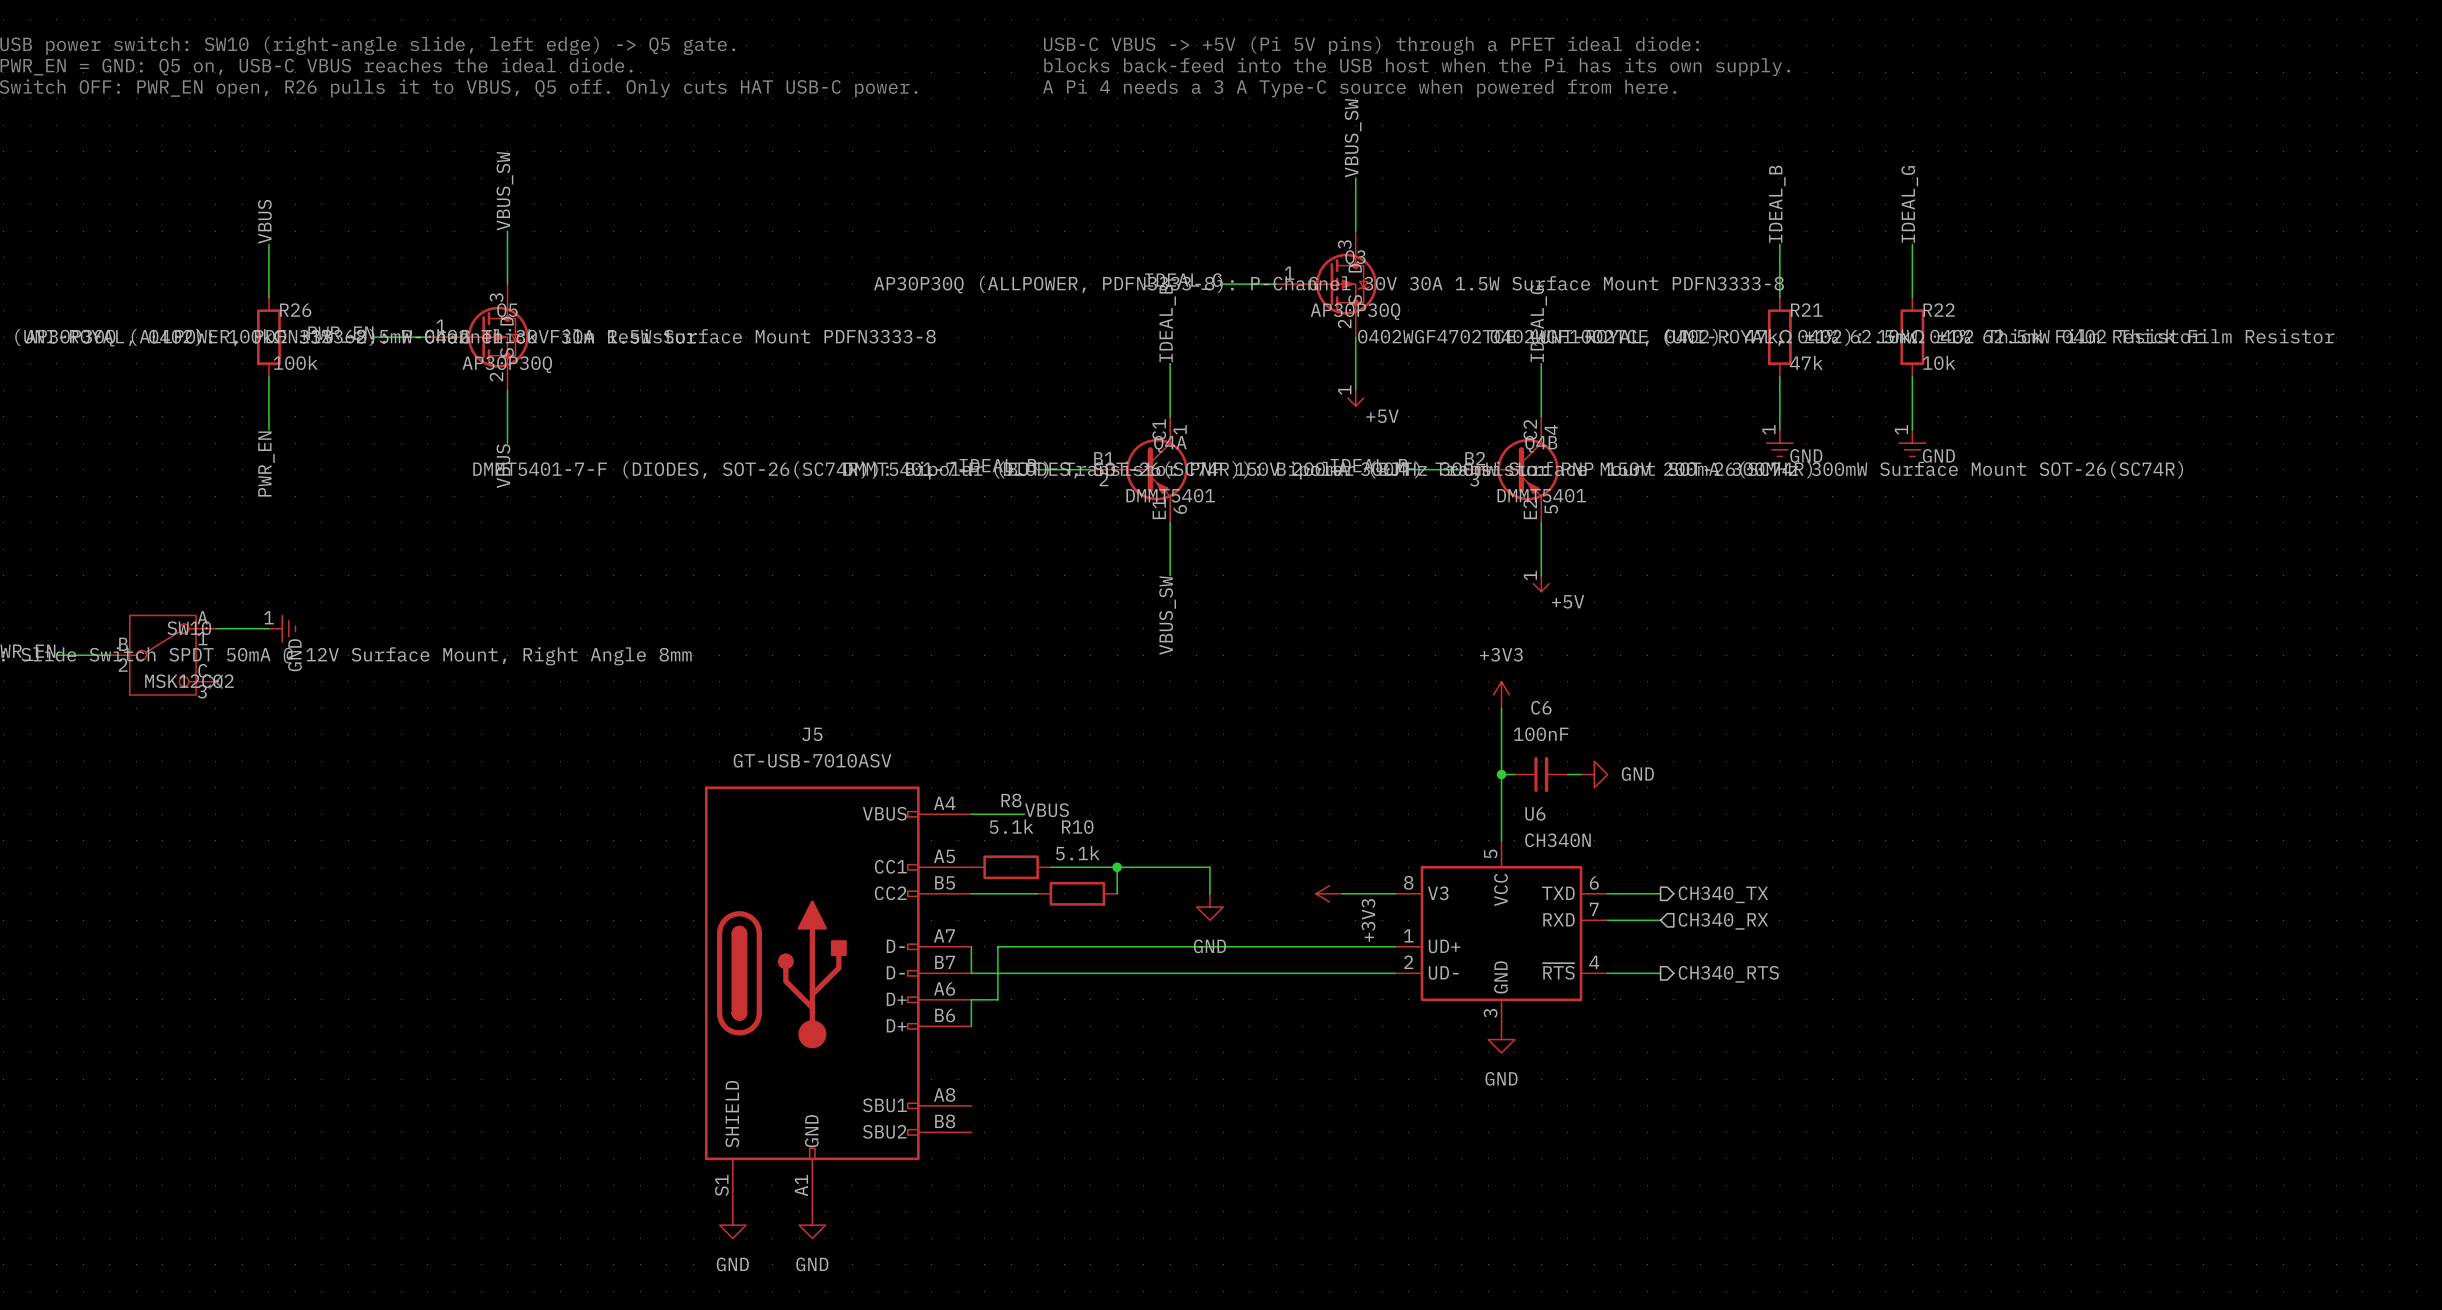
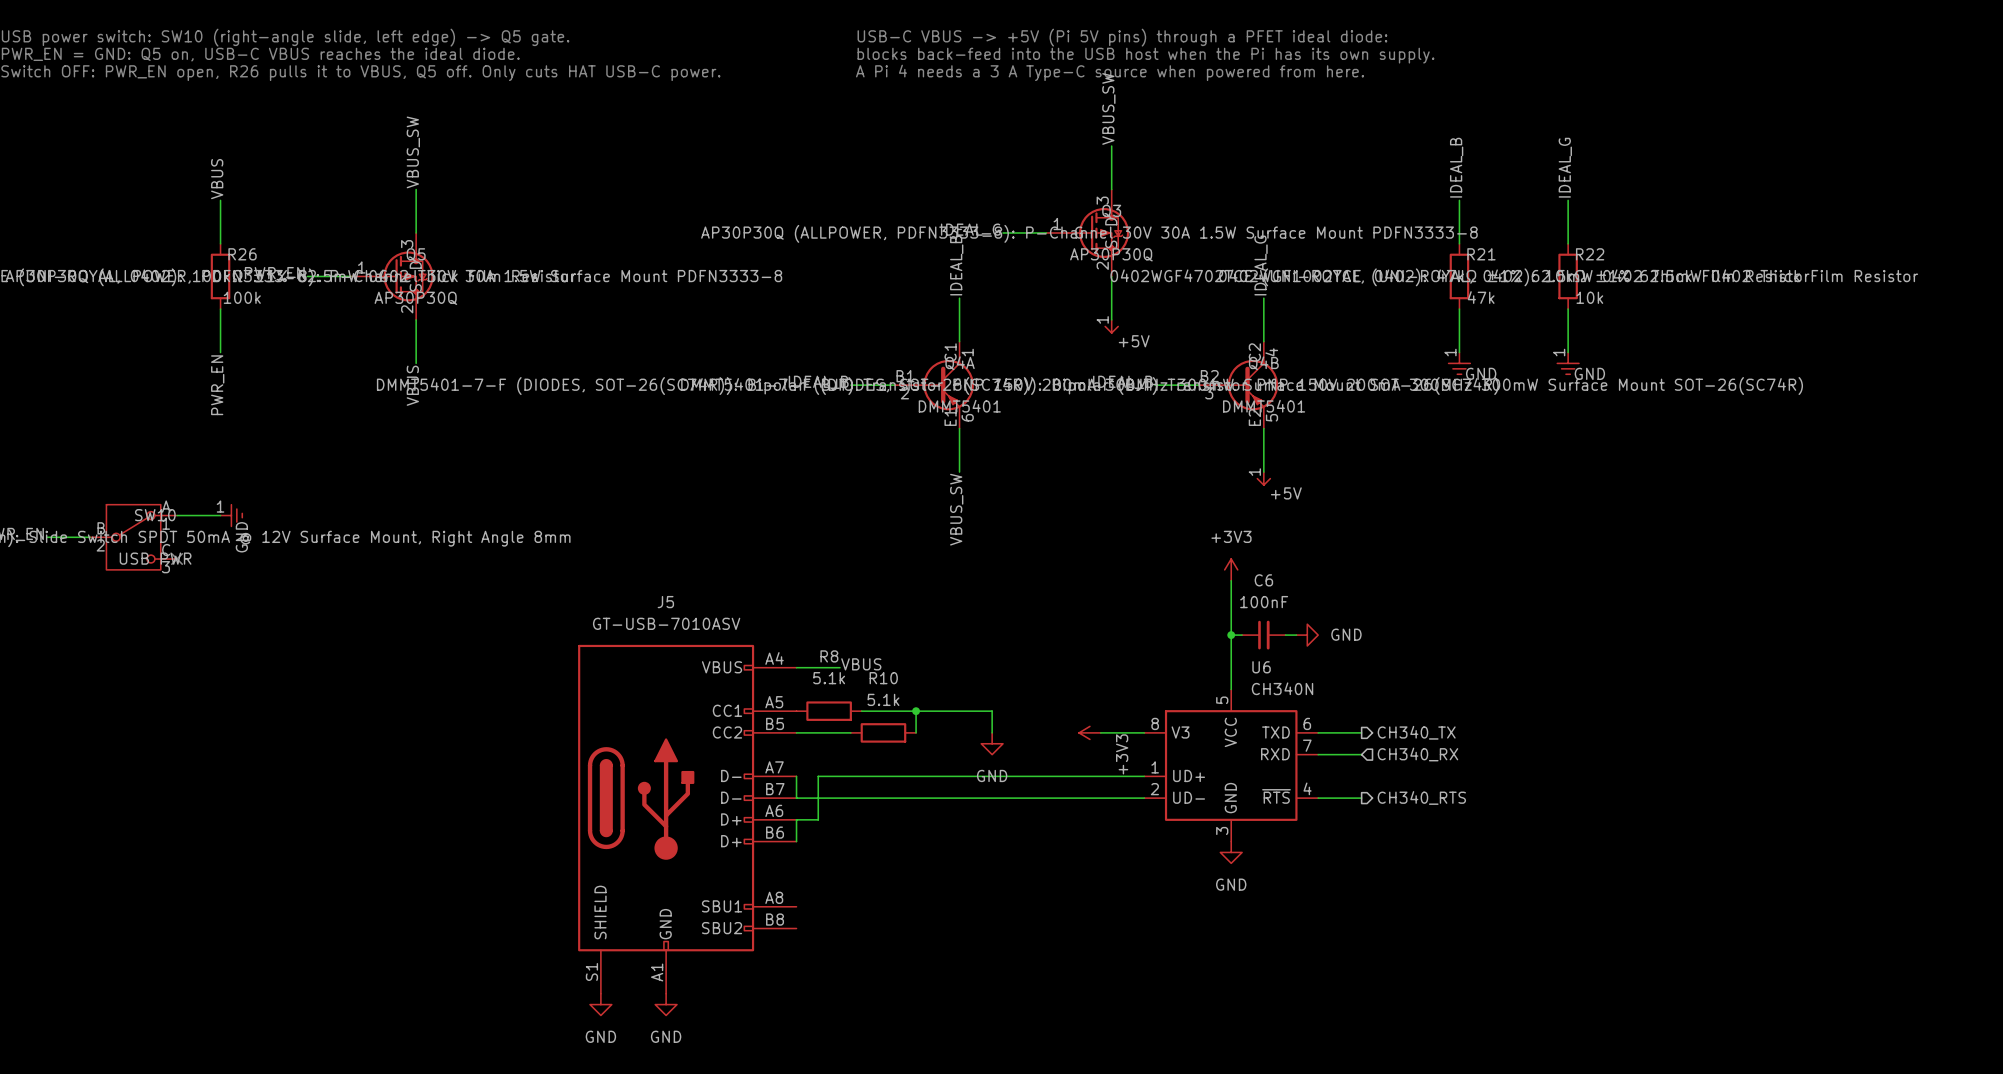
SW10 value: MSK12C02 (189, 681) -> USB PWR (155, 558)

